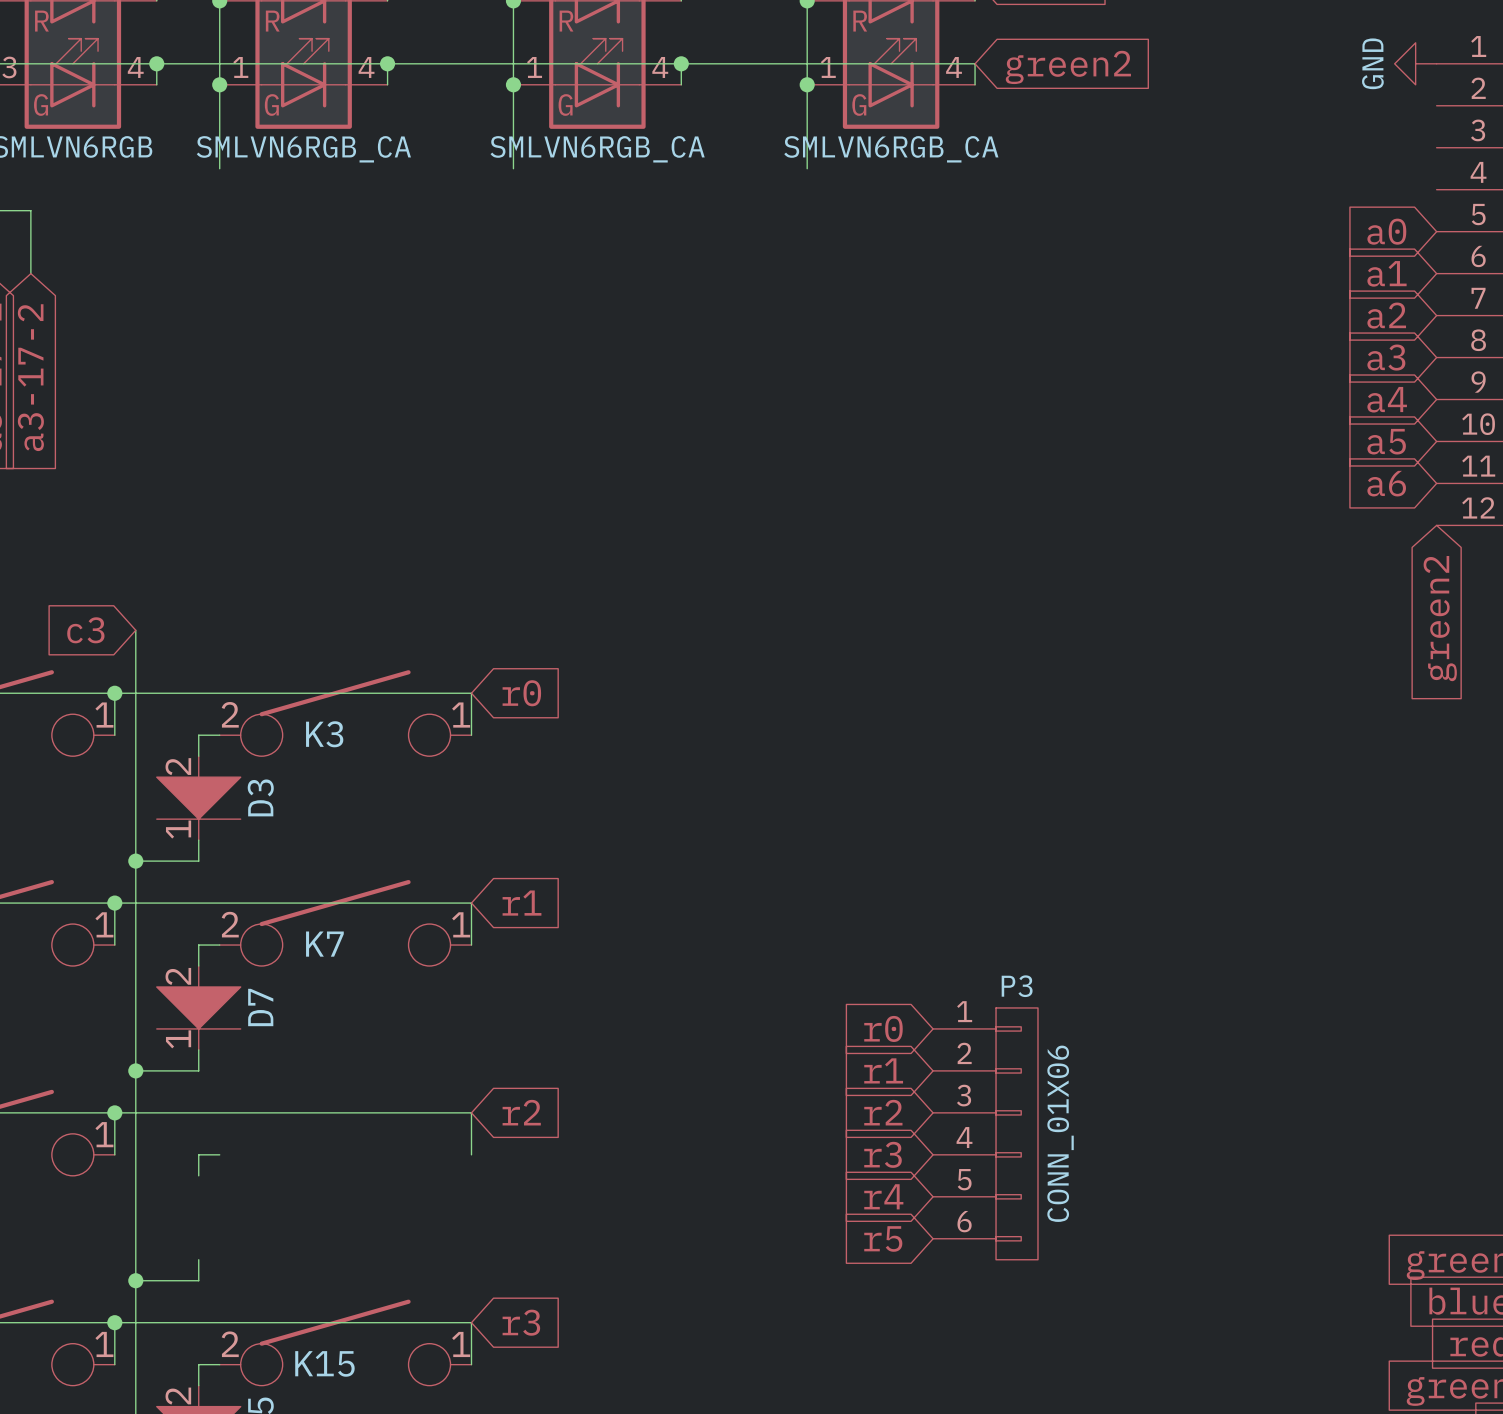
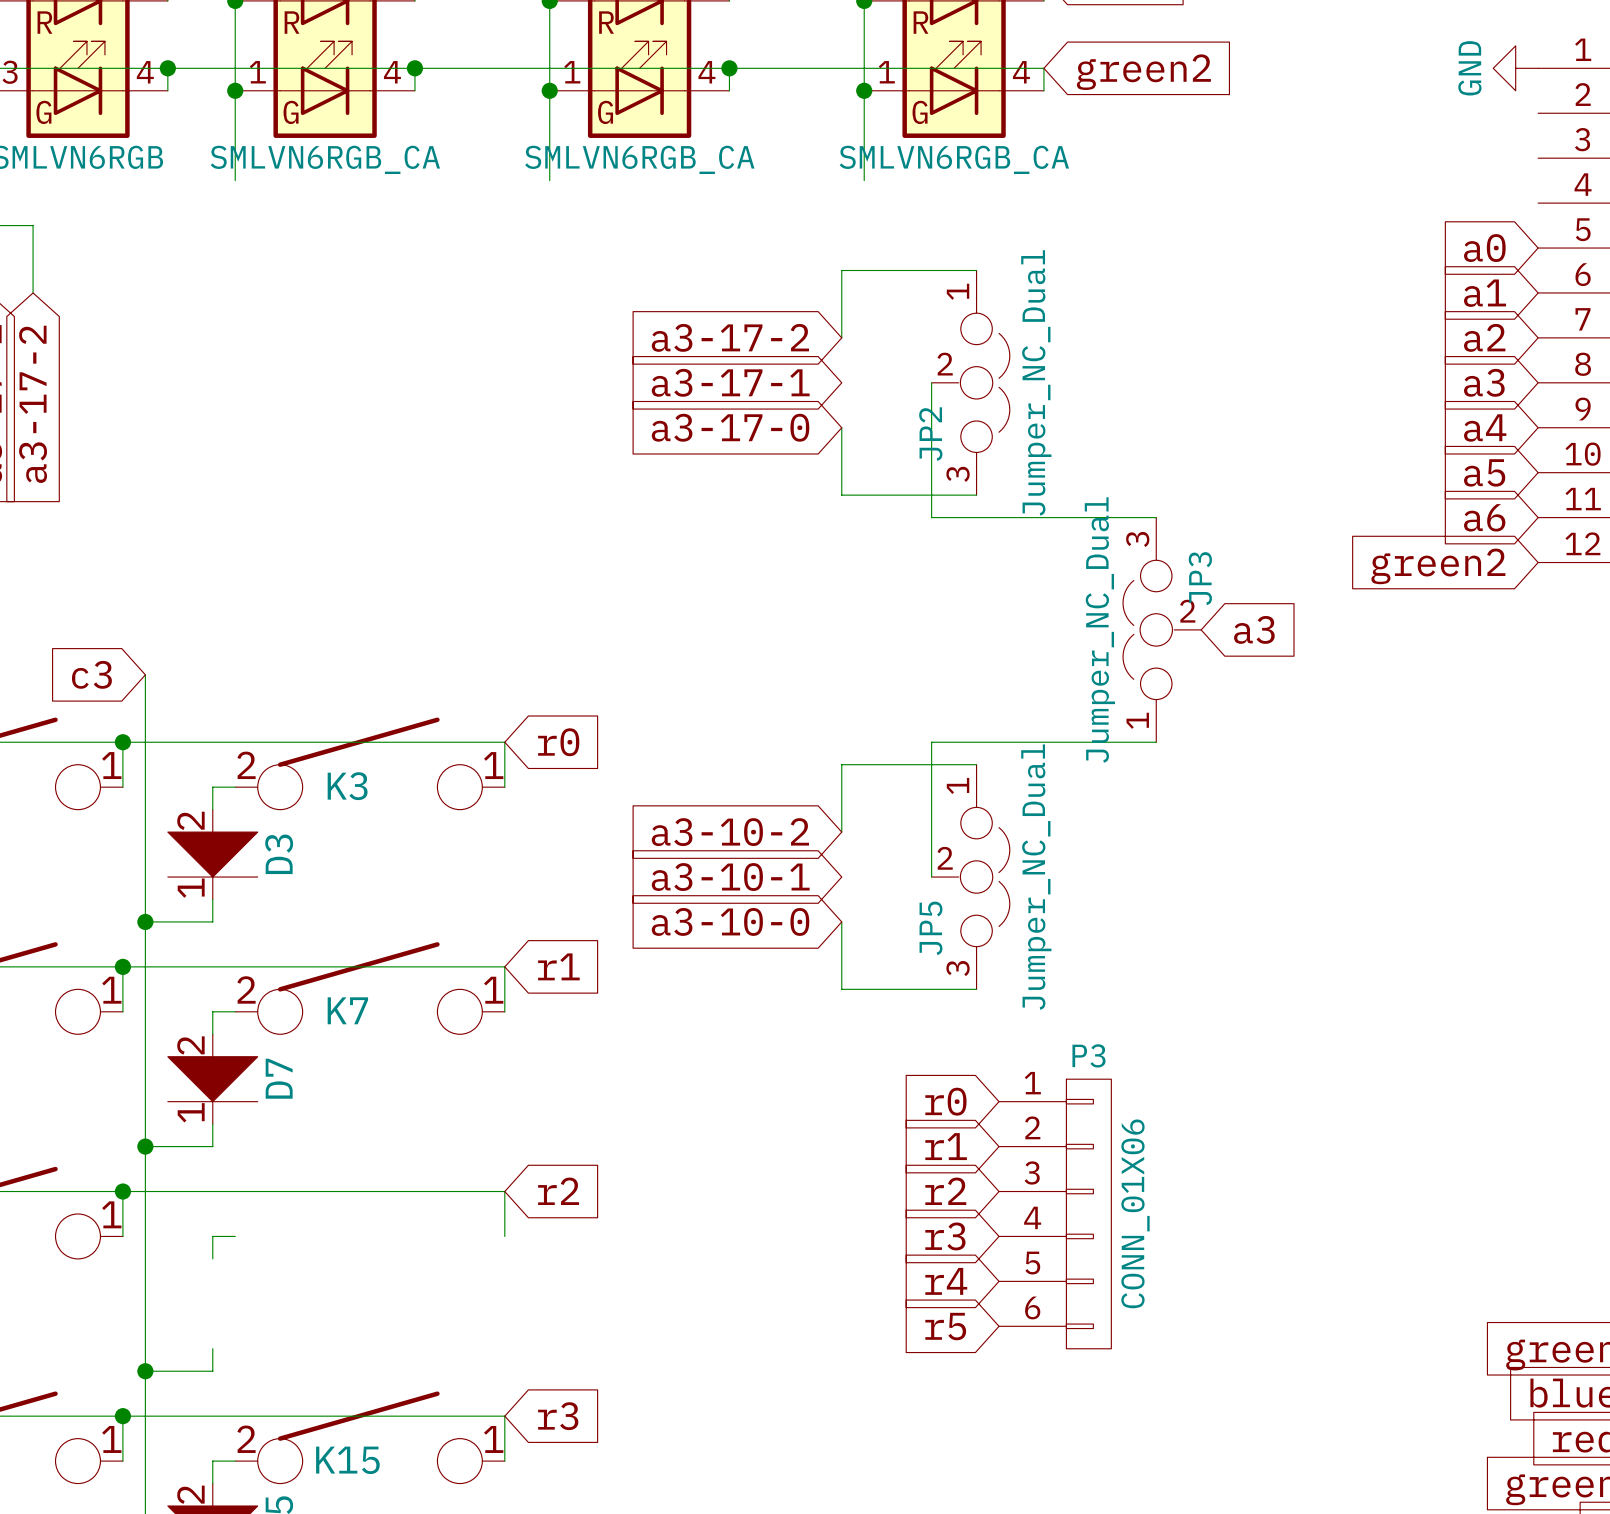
wire: none -> (976, 270) (841, 270) (841, 337)
global label: none -> a3-17-2 (730, 337)
global label: none -> a3-17-1 (730, 382)
wire: none -> (931, 382) (931, 517) (1156, 517)
JP2: none -> Jumper_NC_Dual (970, 382)
global label: none -> a3-17-0 (730, 427)
wire: none -> (841, 427) (841, 495) (976, 495)
JP3: none -> Jumper_NC_Dual (1162, 629)
global label: none -> a3 (1254, 629)
global label rotation: 0° (1440, 618) -> 90° clockwise (1438, 566)
wire: none -> (1156, 742) (931, 742) (931, 877)
wire: none -> (976, 764) (841, 764) (841, 832)
global label: none -> a3-10-2 (730, 832)
global label: none -> a3-10-1 (730, 877)
JP5: none -> Jumper_NC_Dual (970, 877)
global label: none -> a3-10-0 (730, 921)
wire: none -> (841, 921) (841, 989) (976, 989)

